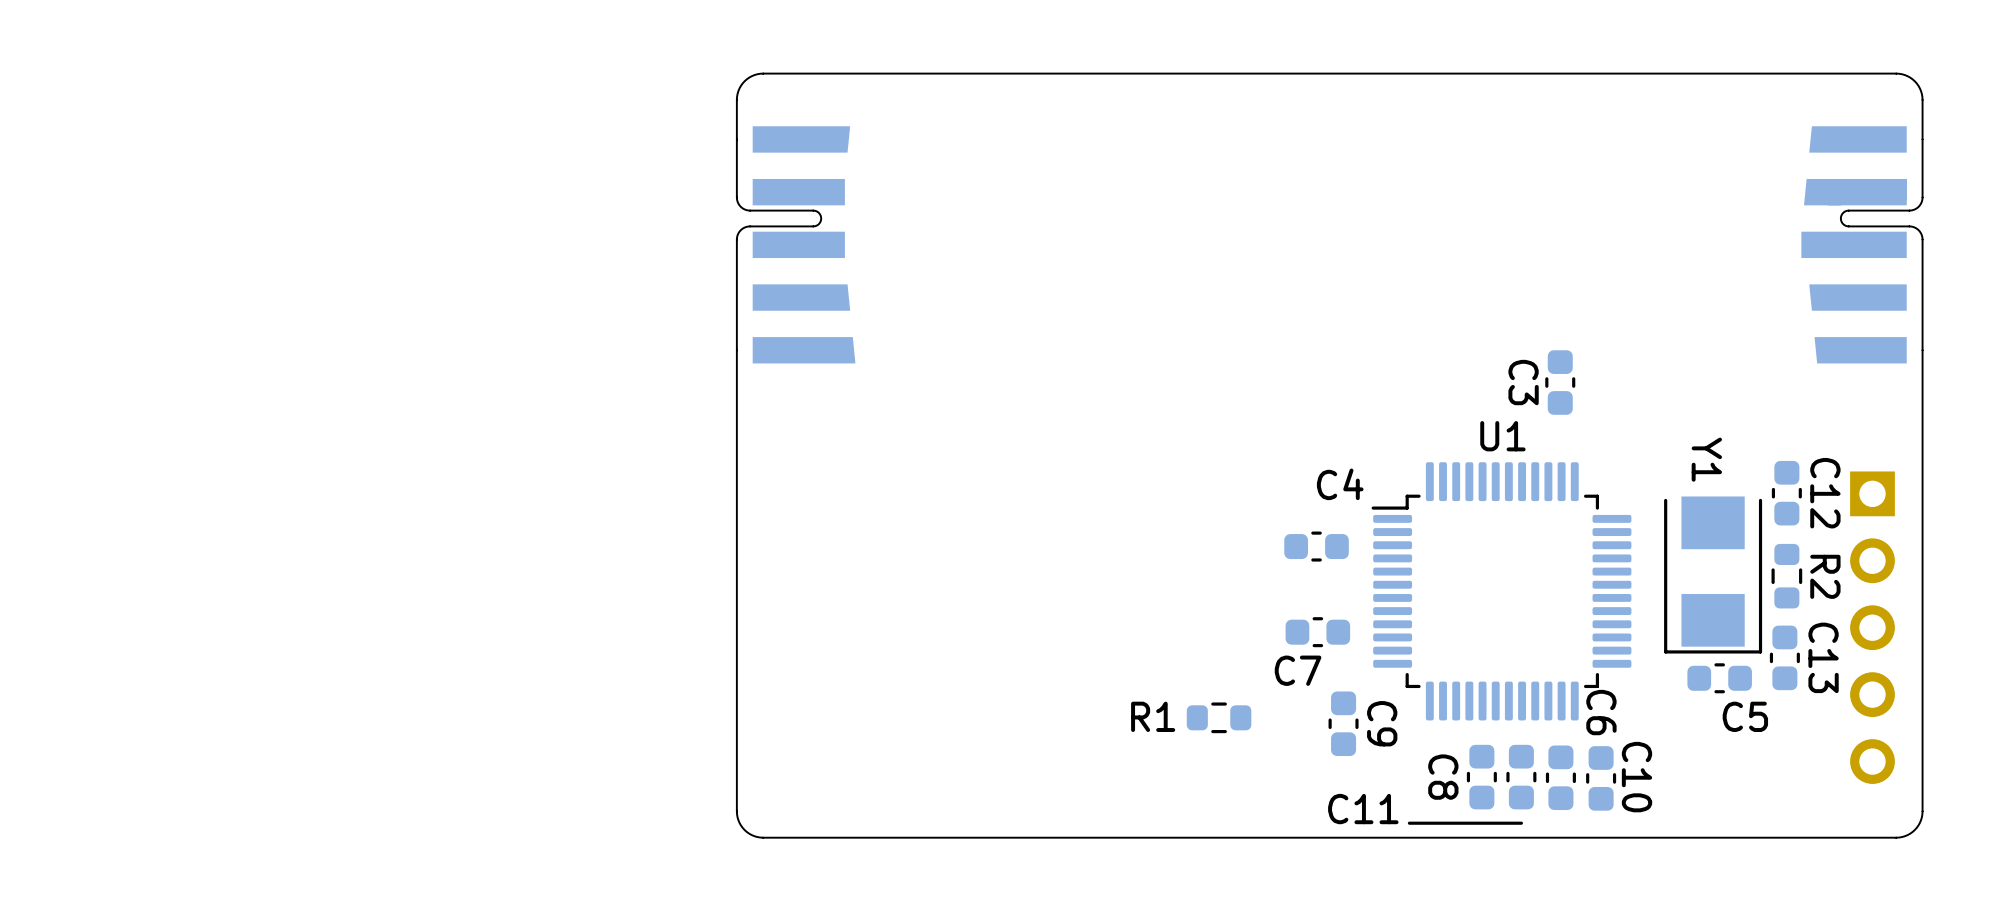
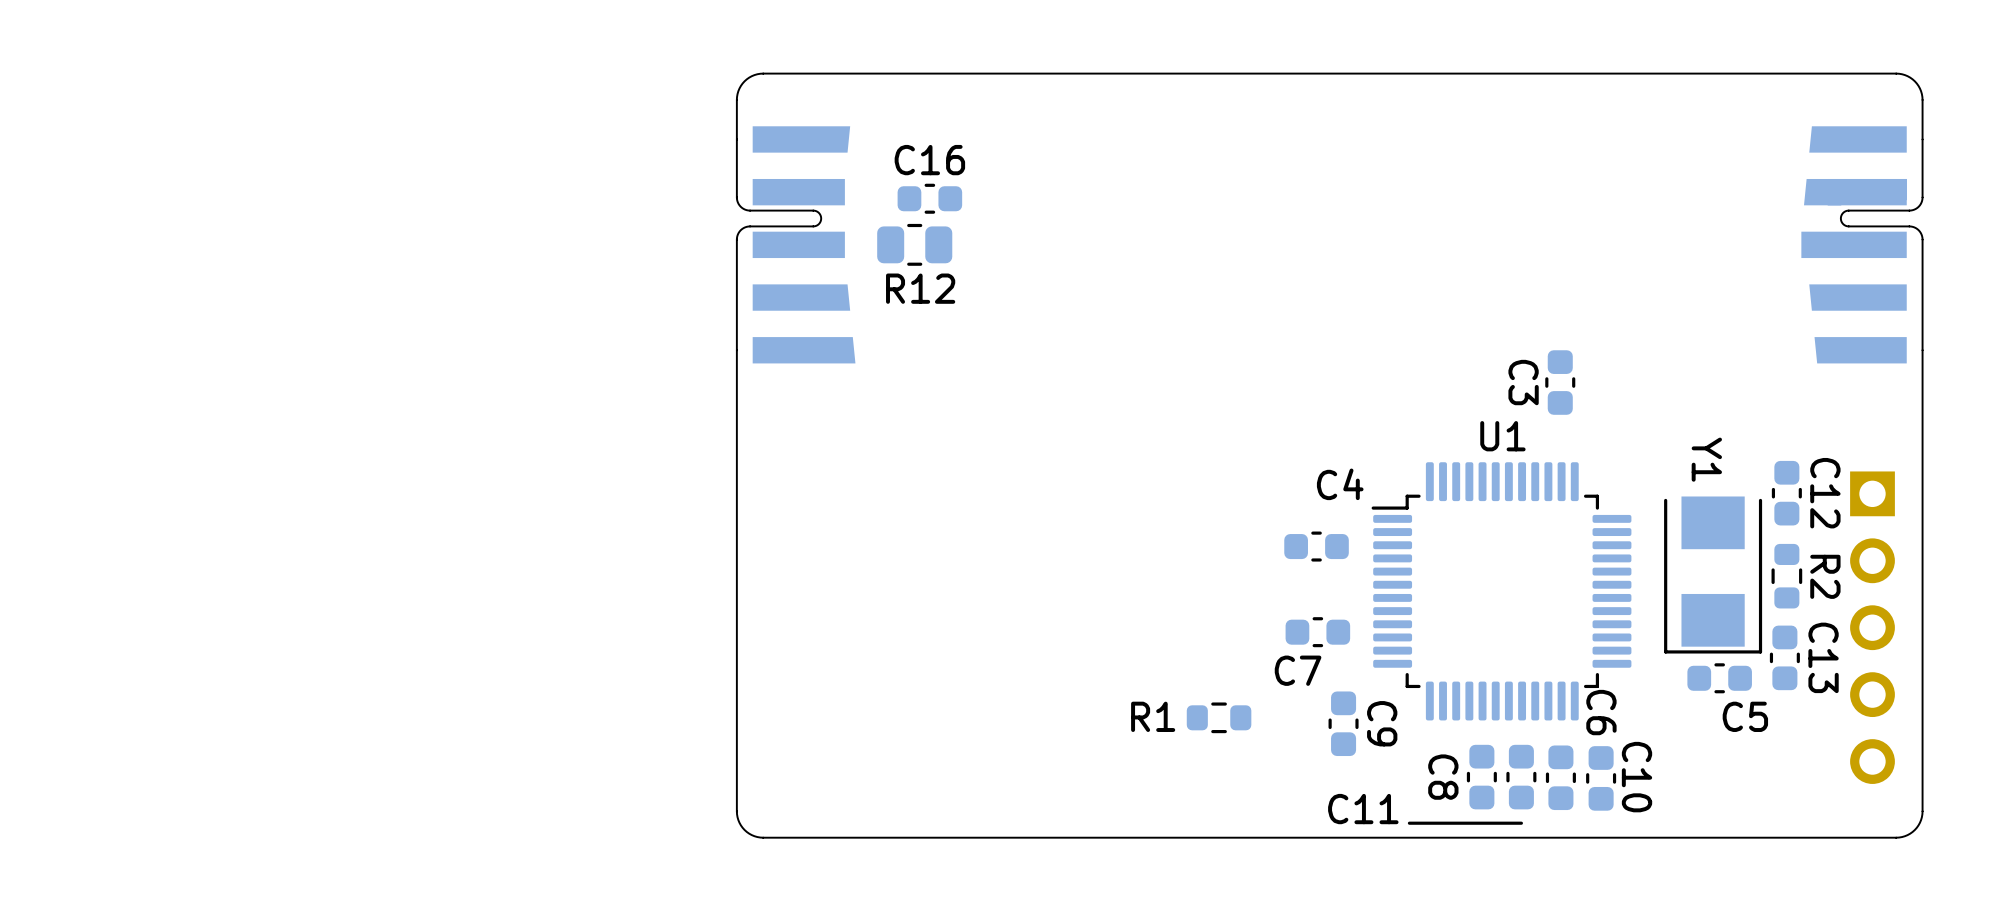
C16: none -> (929, 198)
R12: none -> (914, 244)

